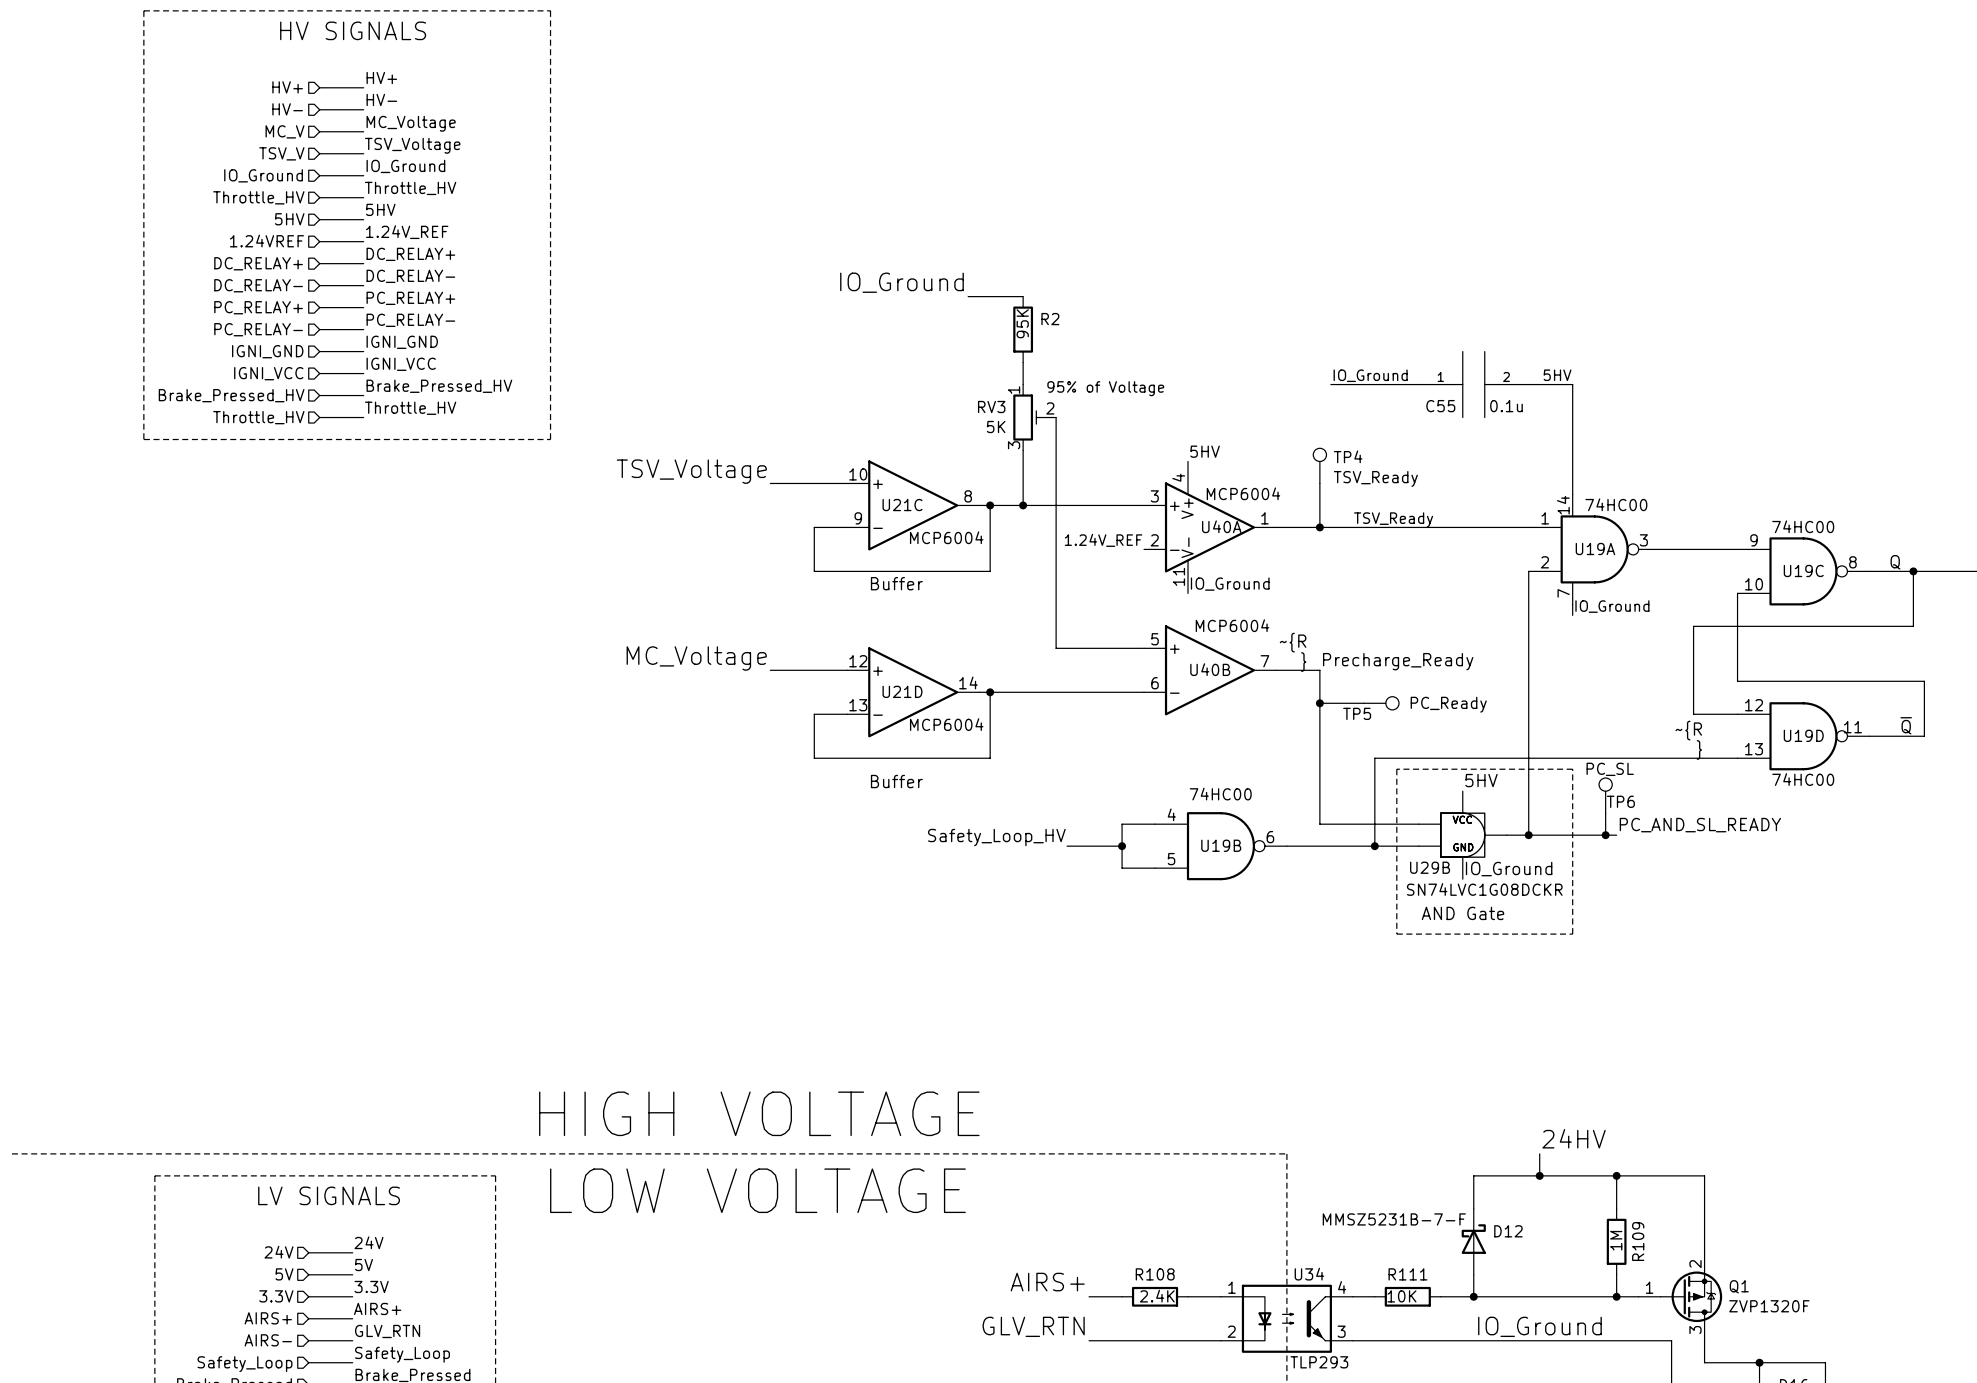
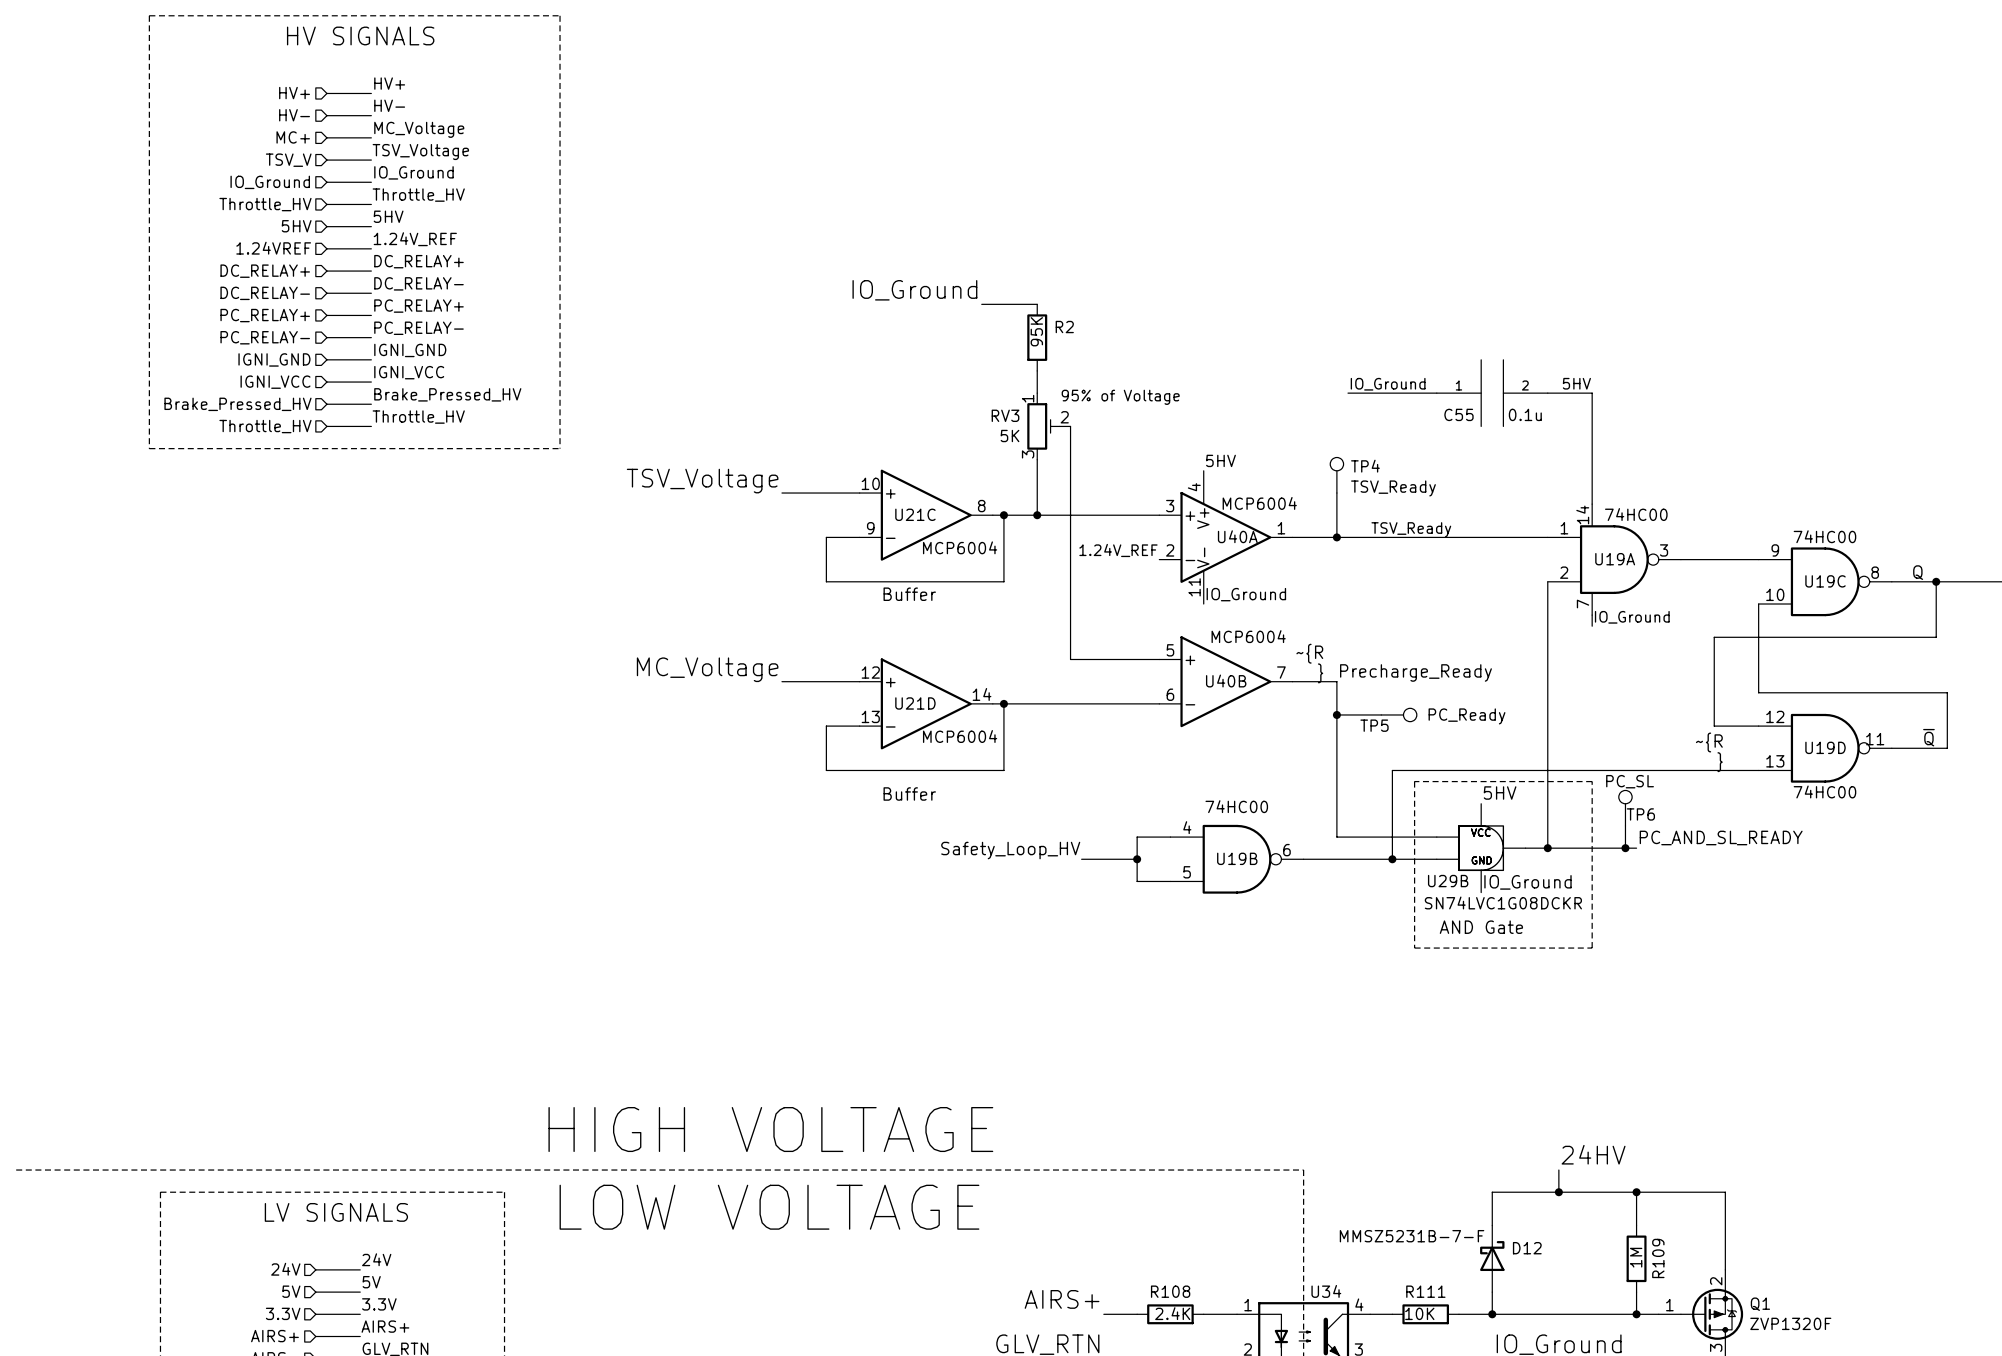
hierarchical label: MC_V (285, 131) -> MC+ (293, 137)

